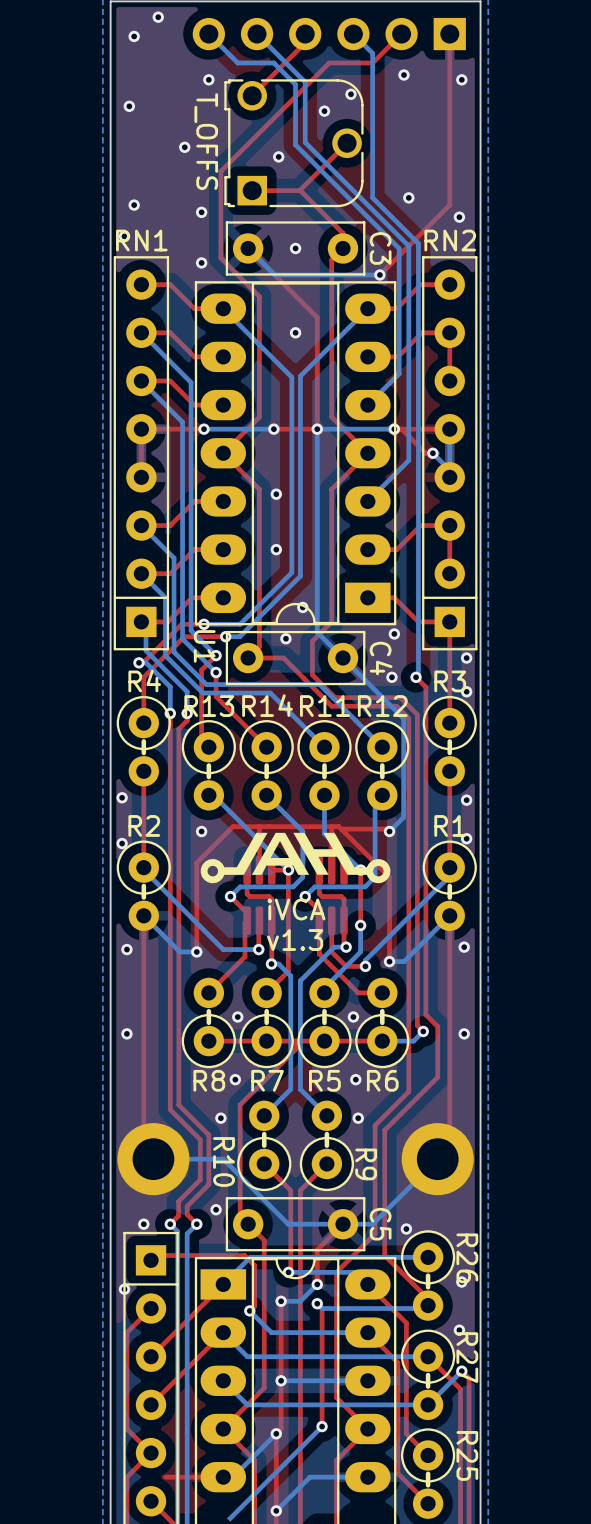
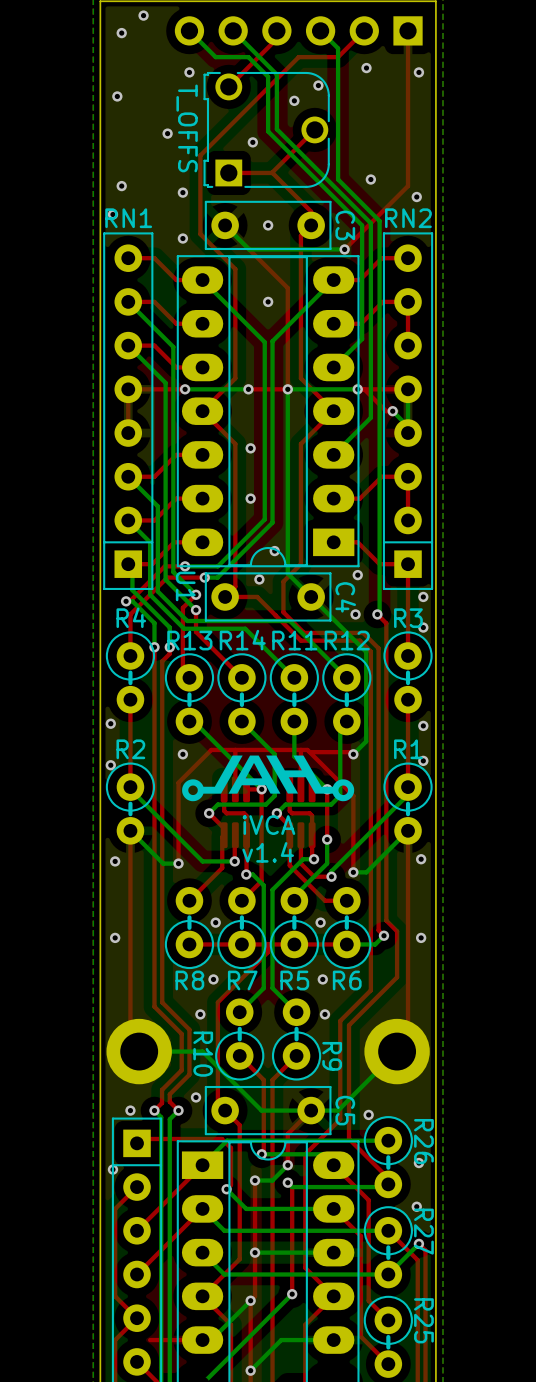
text: v1.3 (295, 940) -> v1.4 (268, 852)

